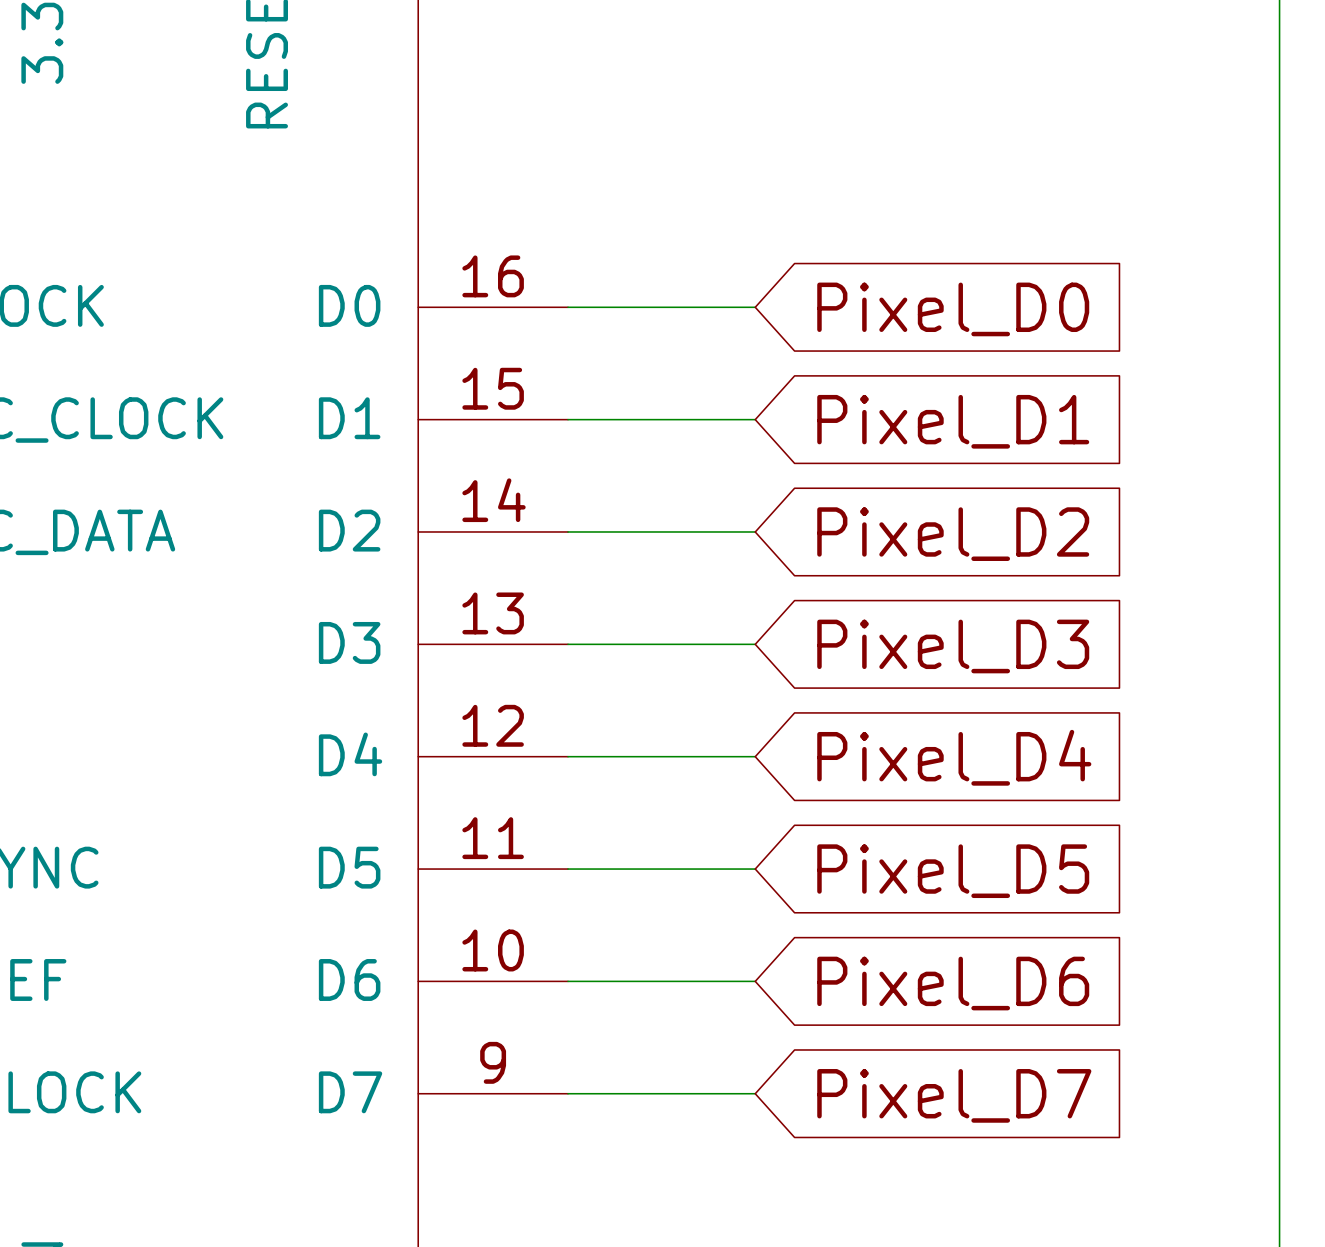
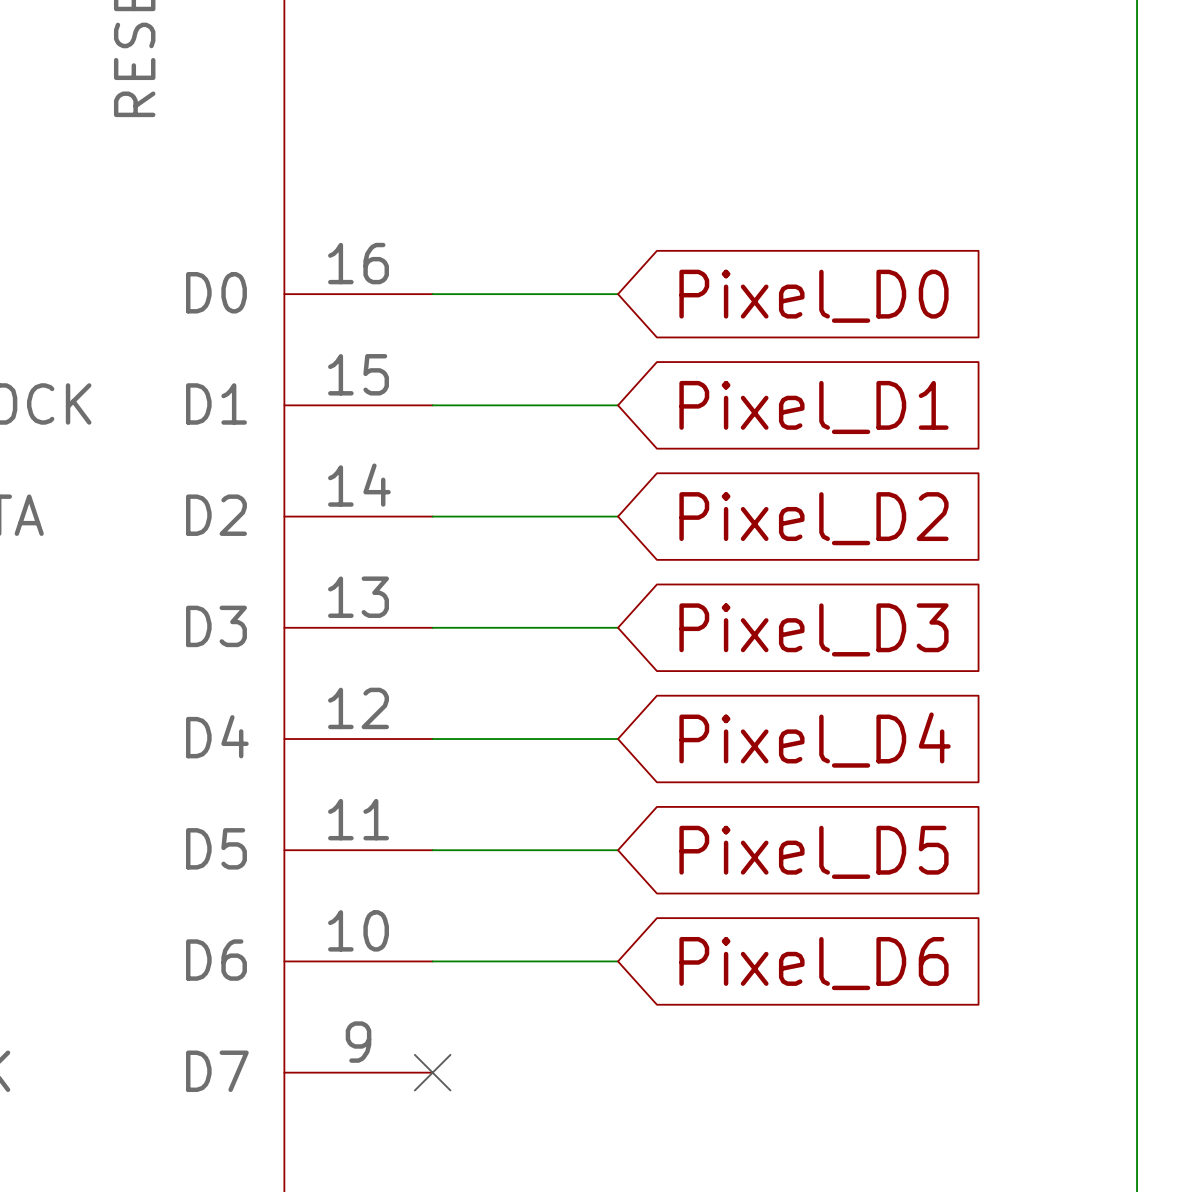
wire: (568, 1093) (755, 1093) -> none
no-connect mark: none -> (432, 1072)
global label: Pixel_D7 (954, 1095) -> none

